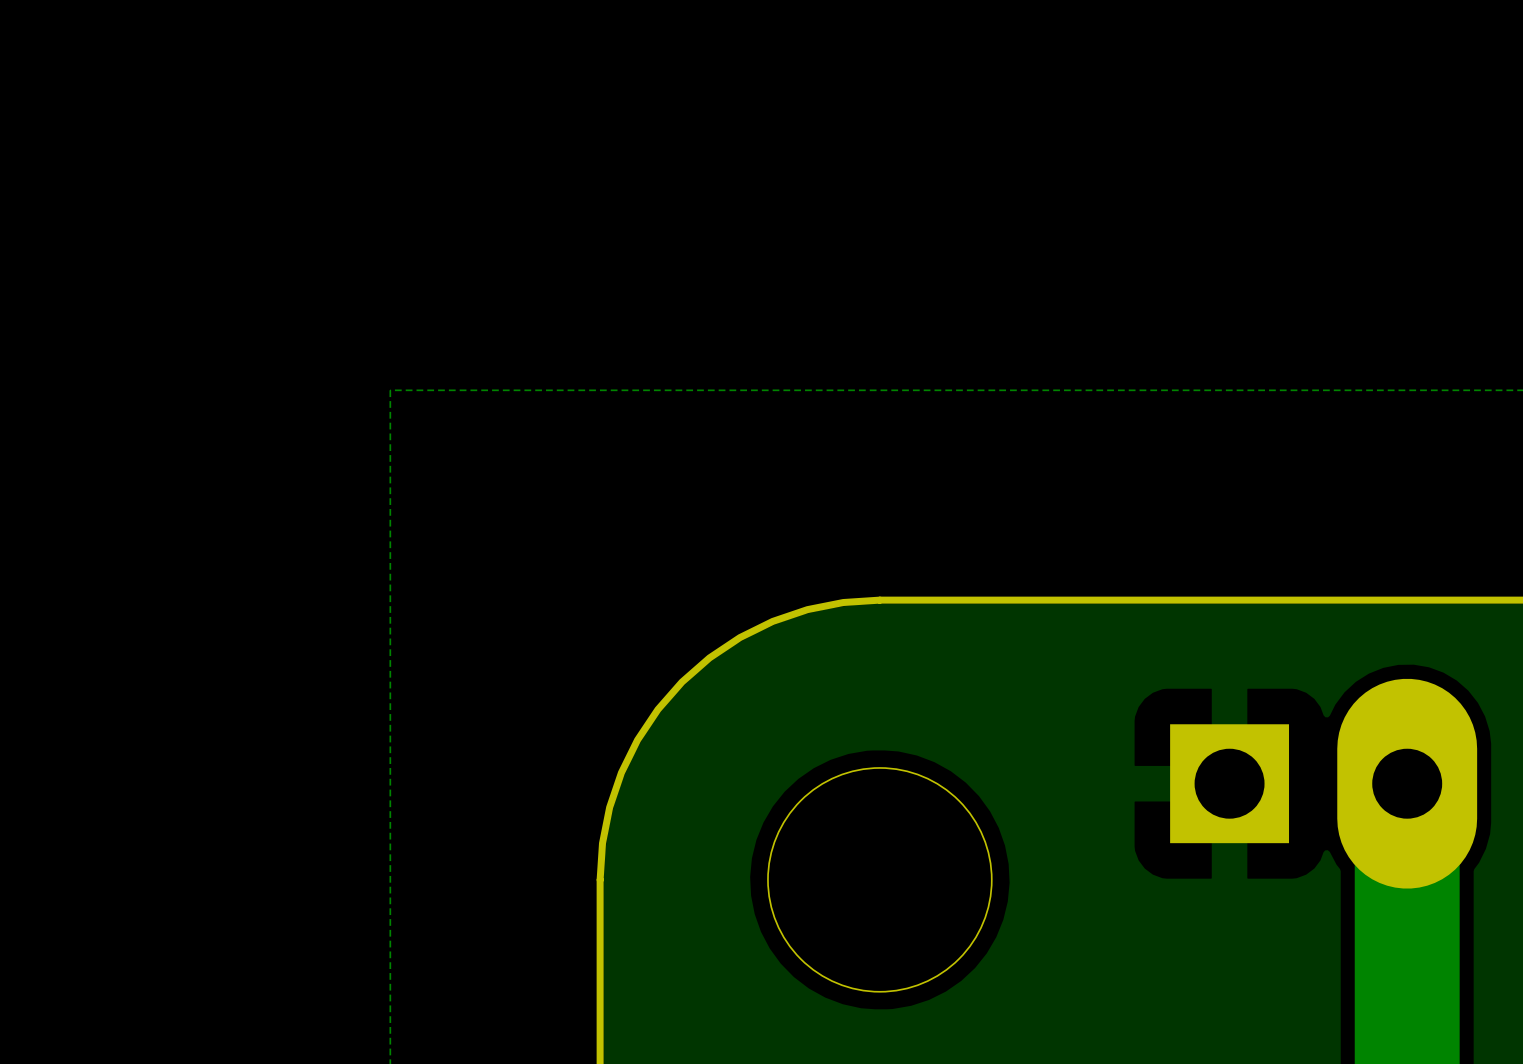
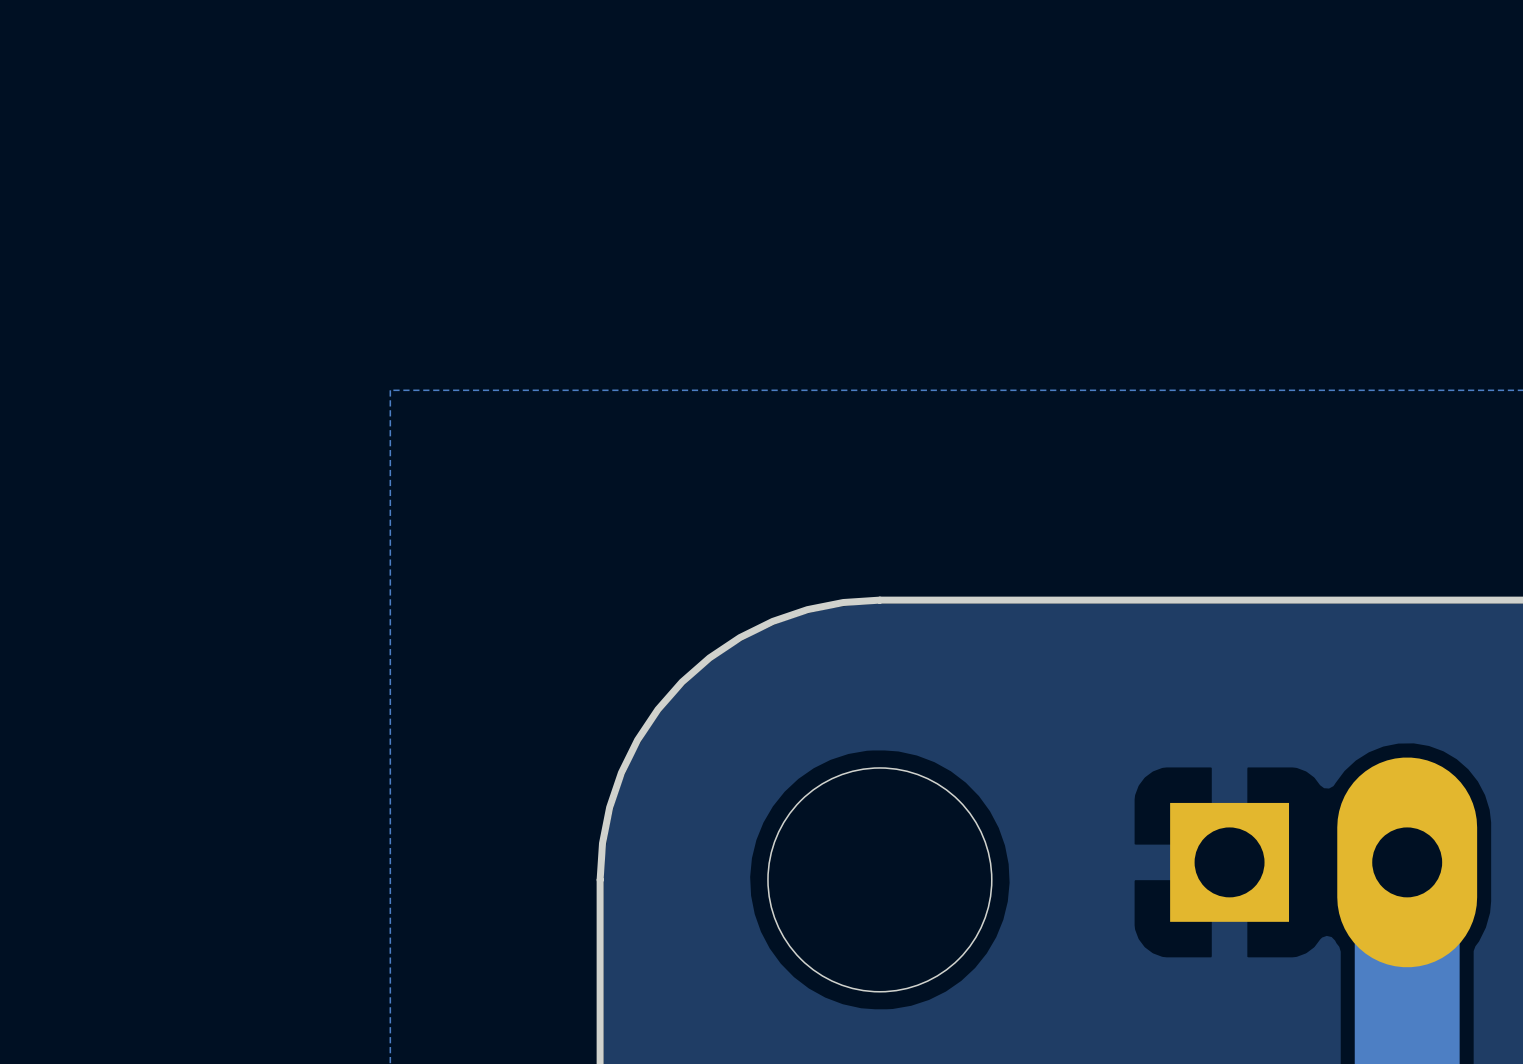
part position: (1323, 783) -> (1323, 862)

